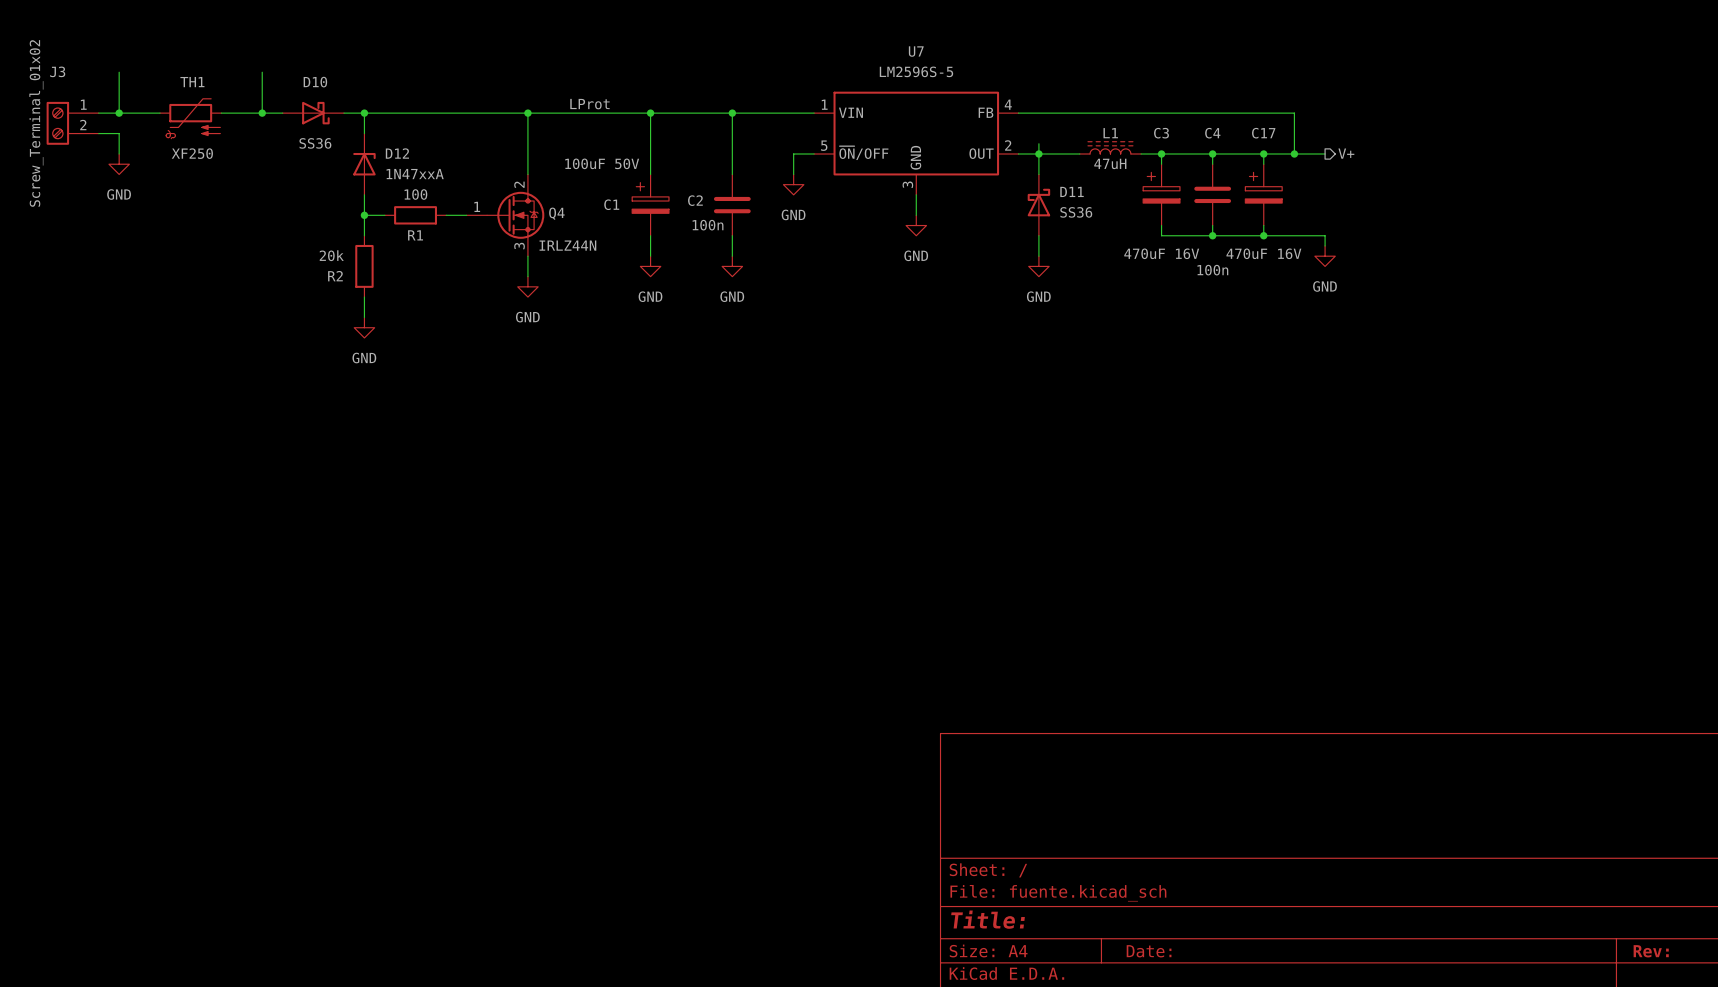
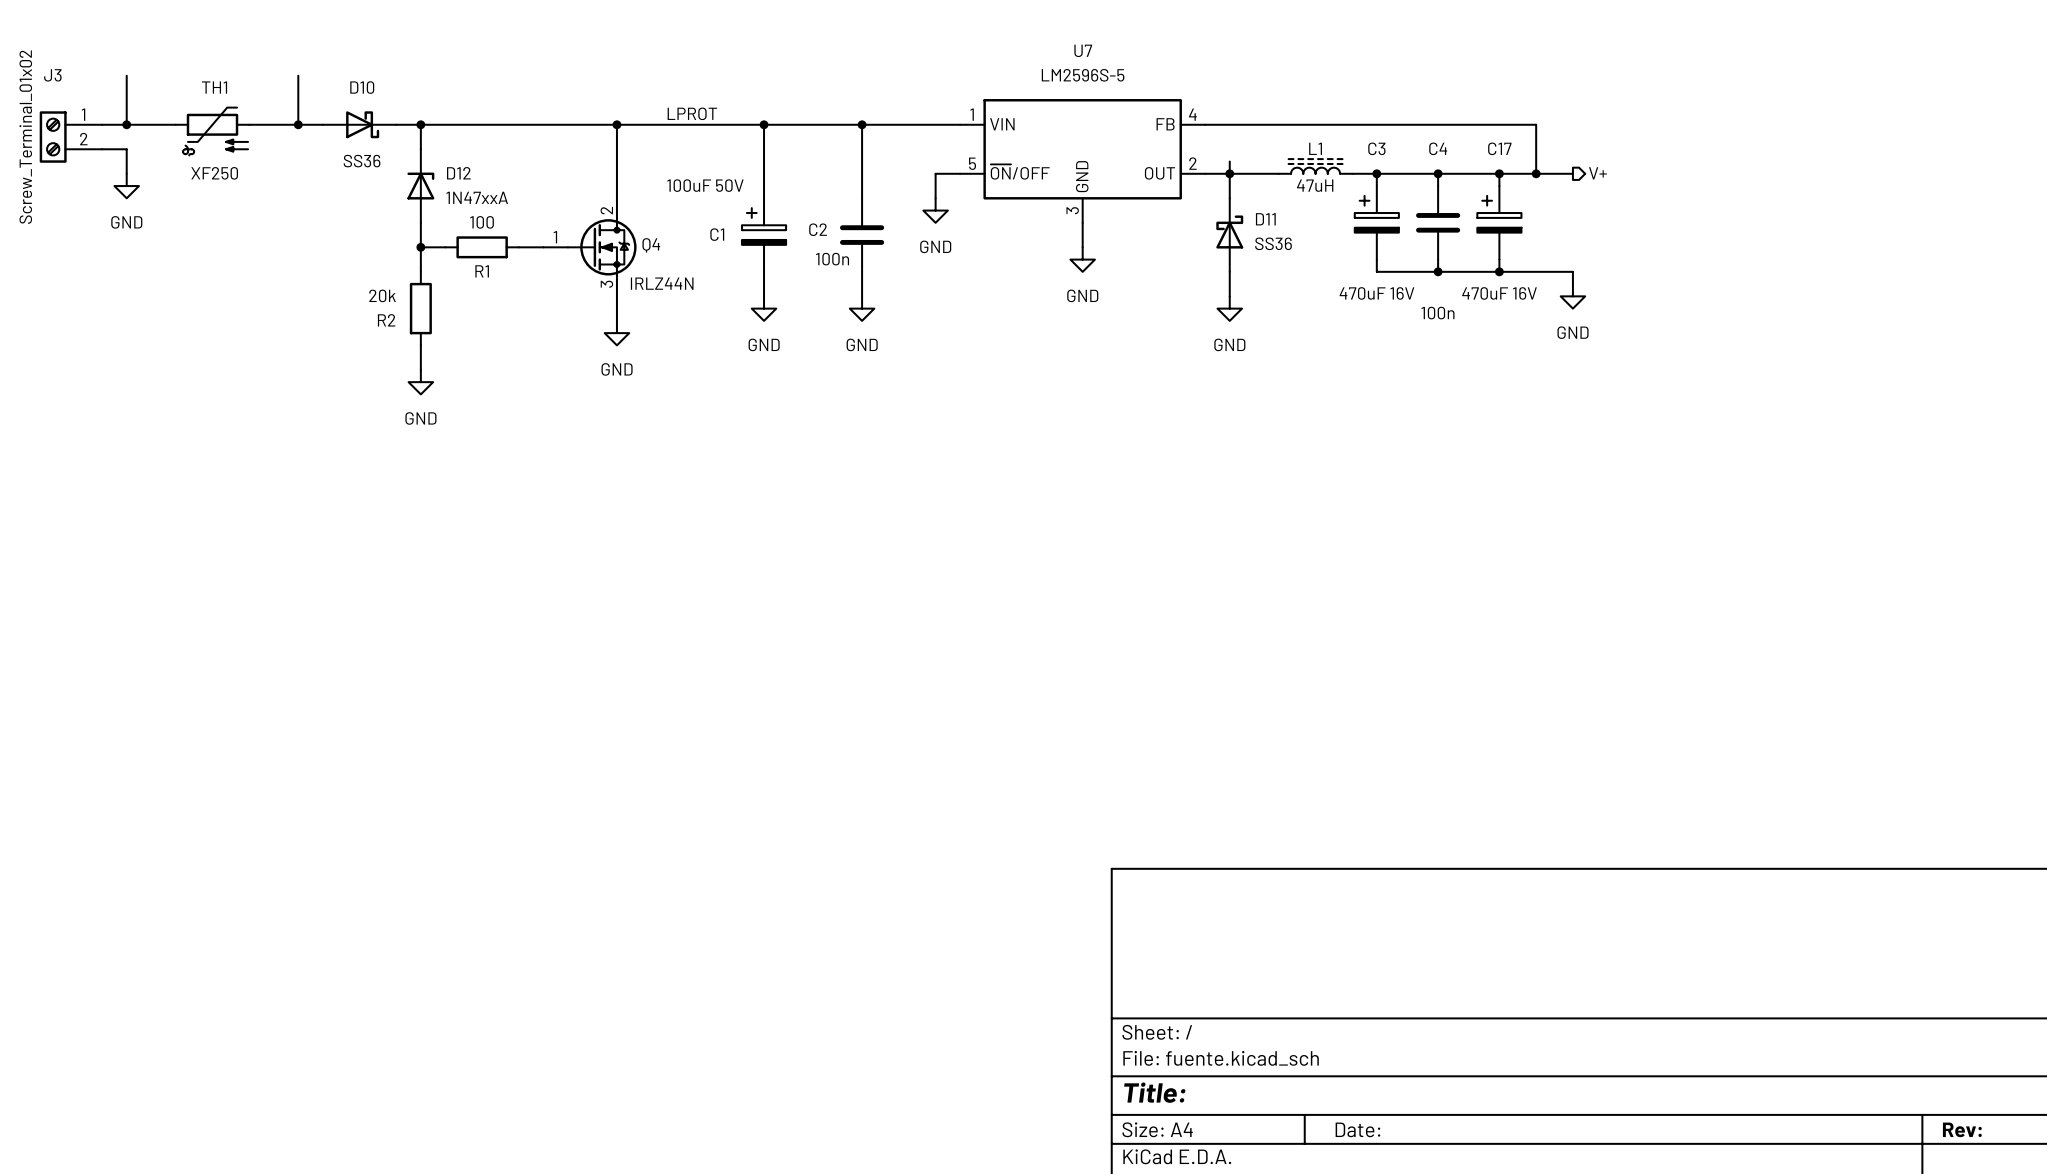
label: LProt (589, 104) -> LPROT (692, 113)

